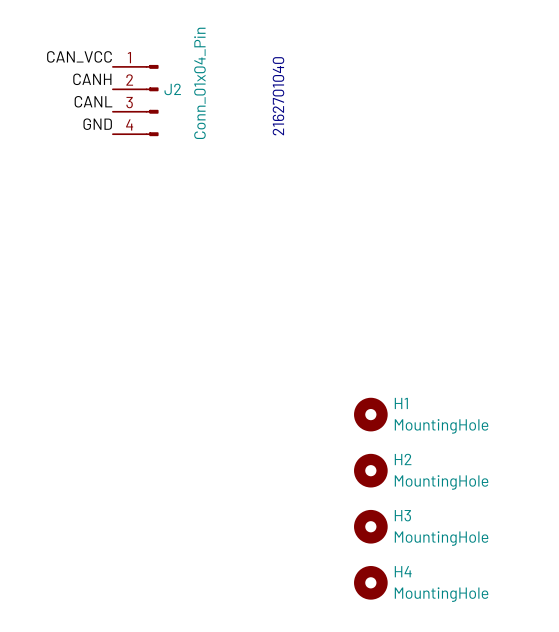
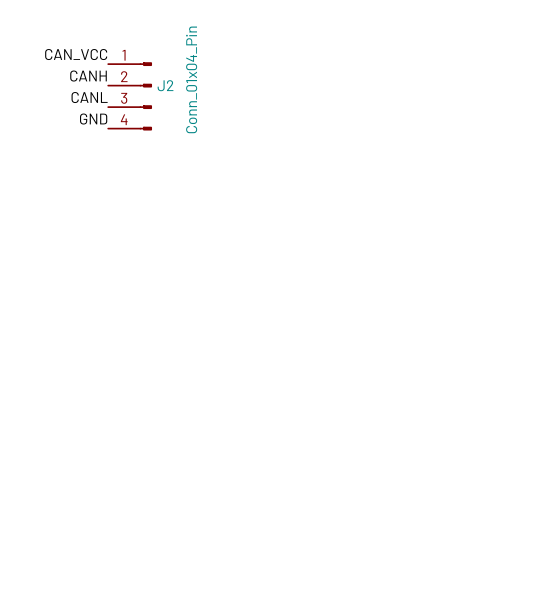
text: 2162701040 (278, 96) -> none
H1: MountingHole (370, 414) -> none
H2: MountingHole (370, 470) -> none
H3: MountingHole (370, 526) -> none
H4: MountingHole (370, 582) -> none

